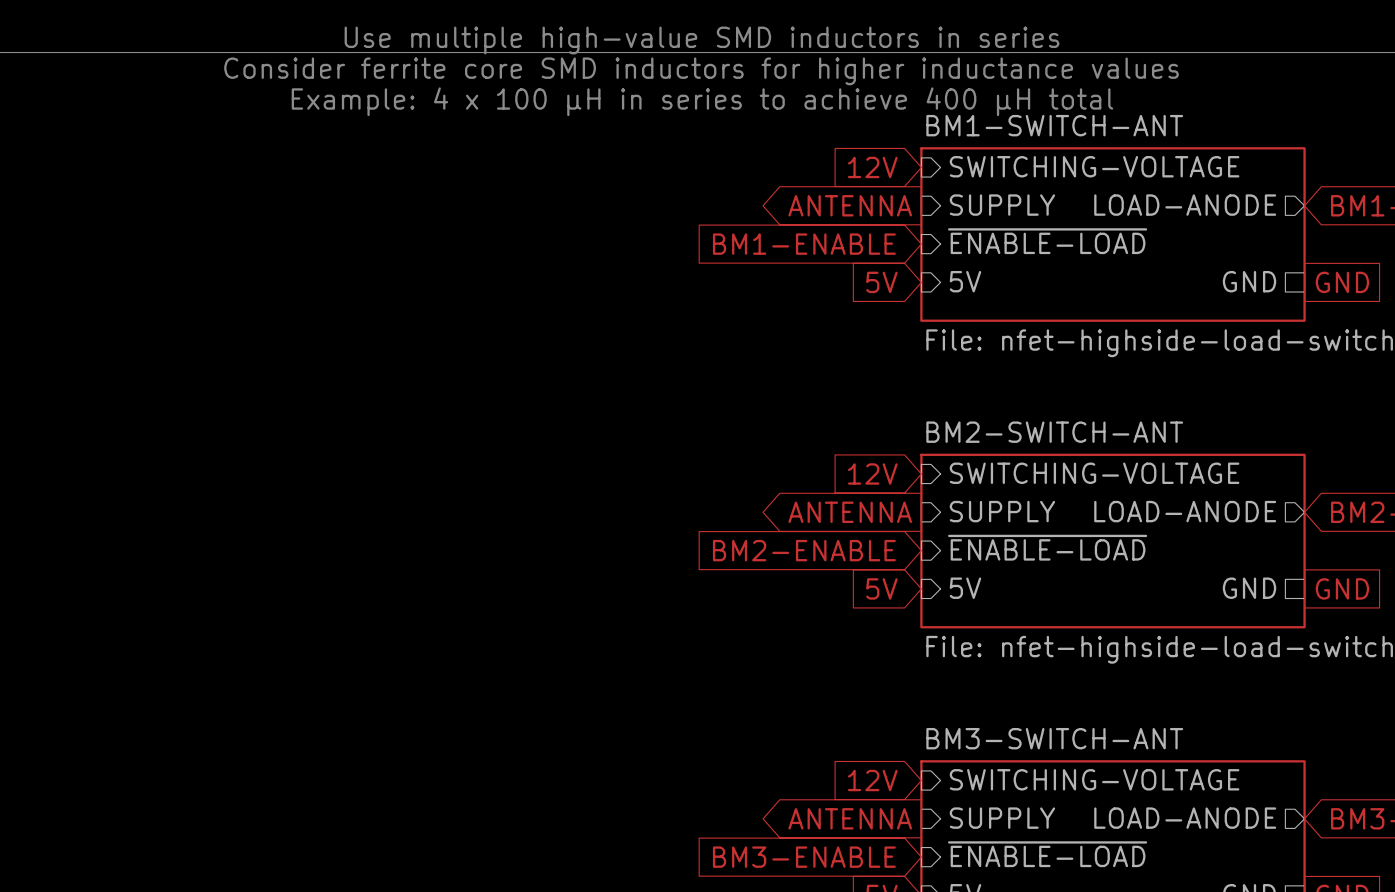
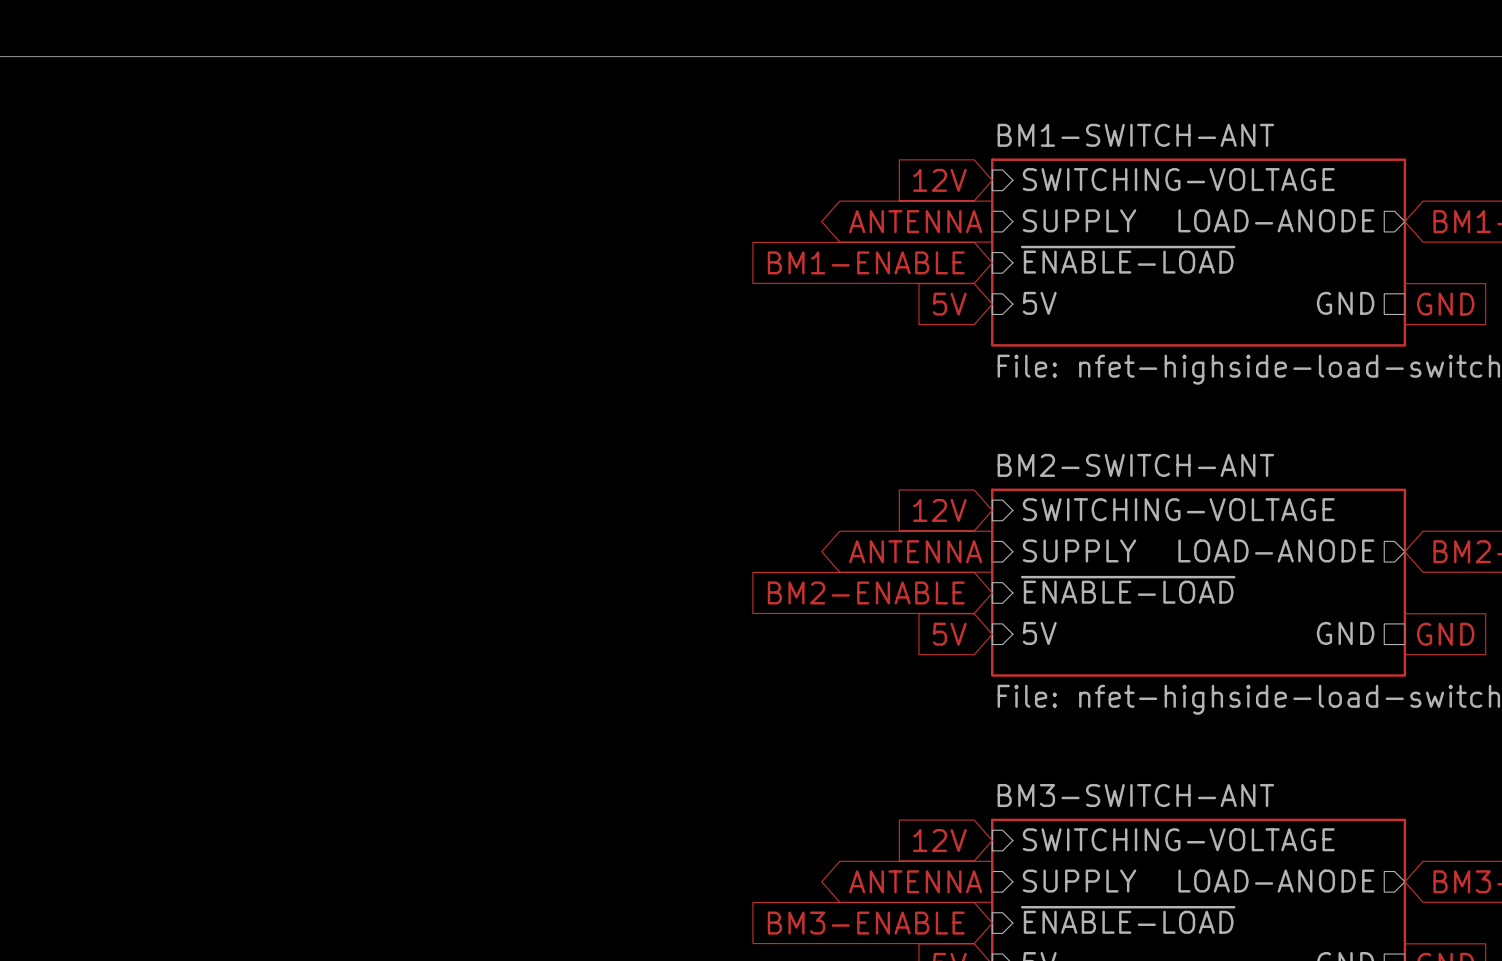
text: Use multiple high-value SMD inductors in series (702, 40) -> none
text: Consider ferrite core SMD inductors for higher inductance values (701, 71) -> none
text: Example: 4 x 100 μH in series to achieve 400 μH total (702, 101) -> none

